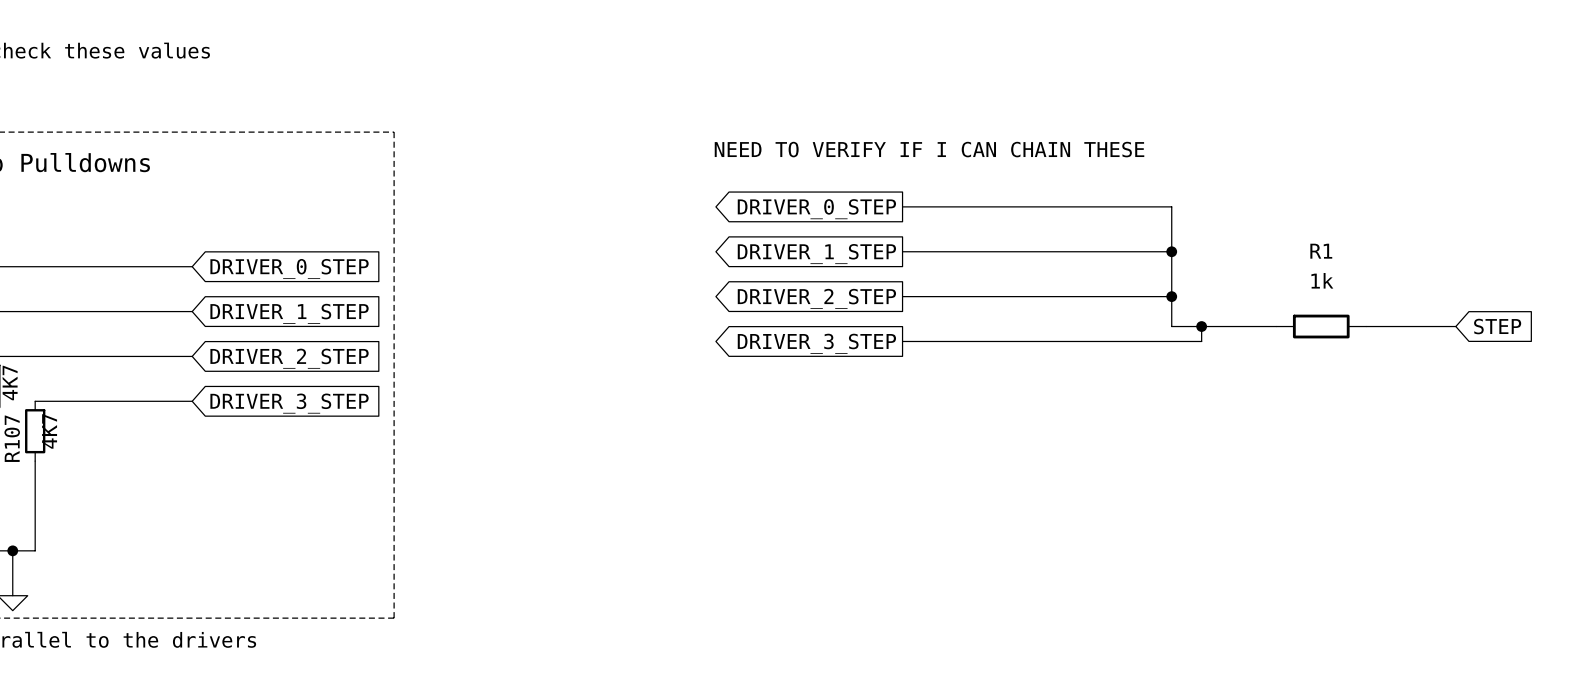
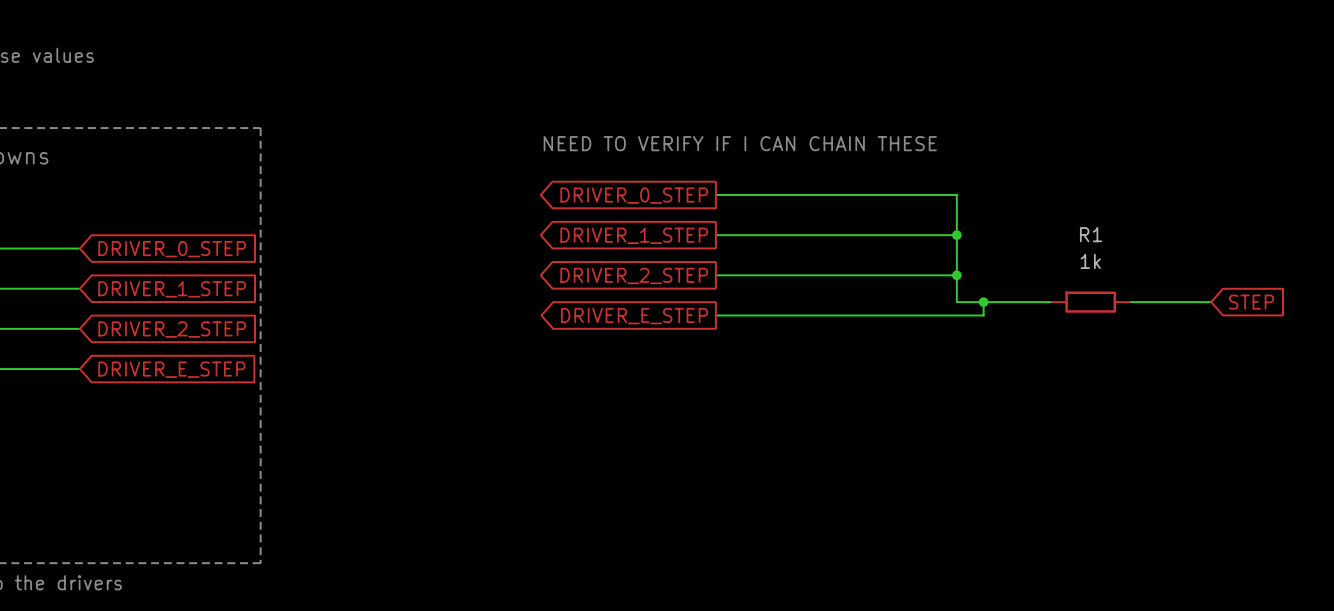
global label: DRIVER_3_STEP (816, 343) -> DRIVER_E_STEP (634, 316)
global label: DRIVER_3_STEP (289, 403) -> DRIVER_E_STEP (171, 369)

